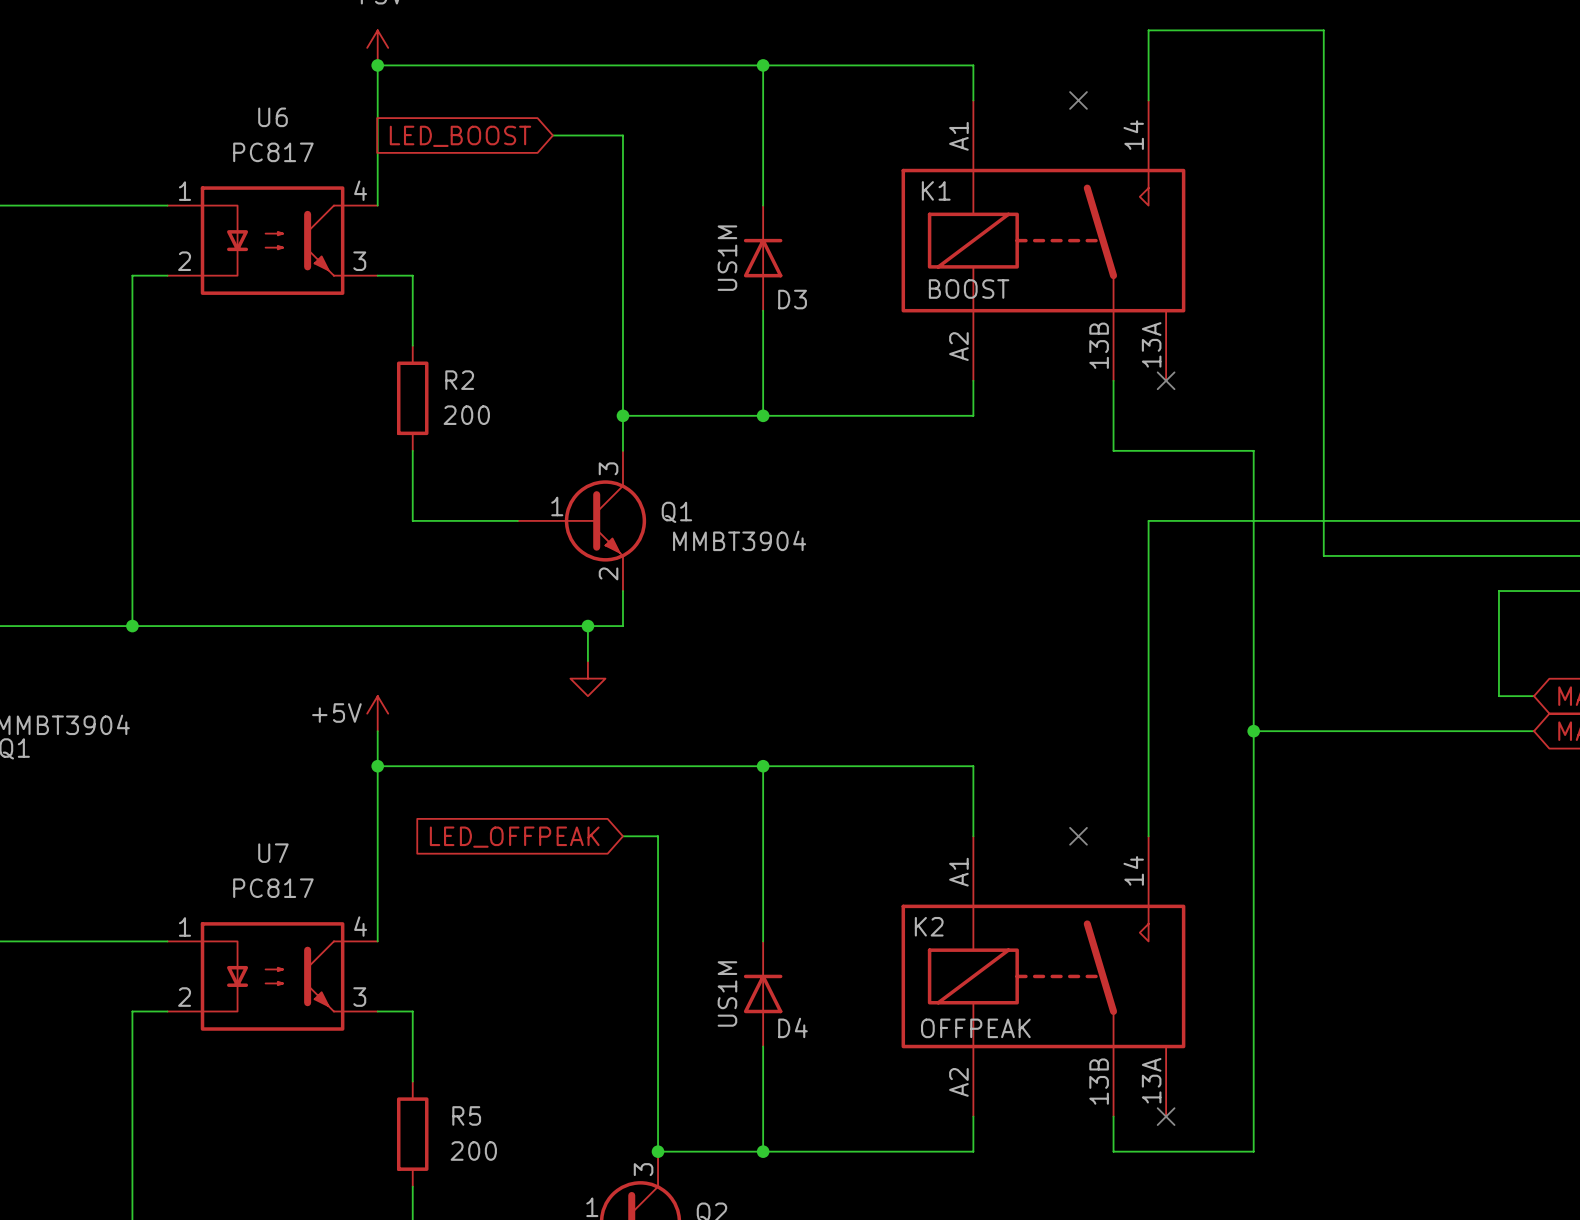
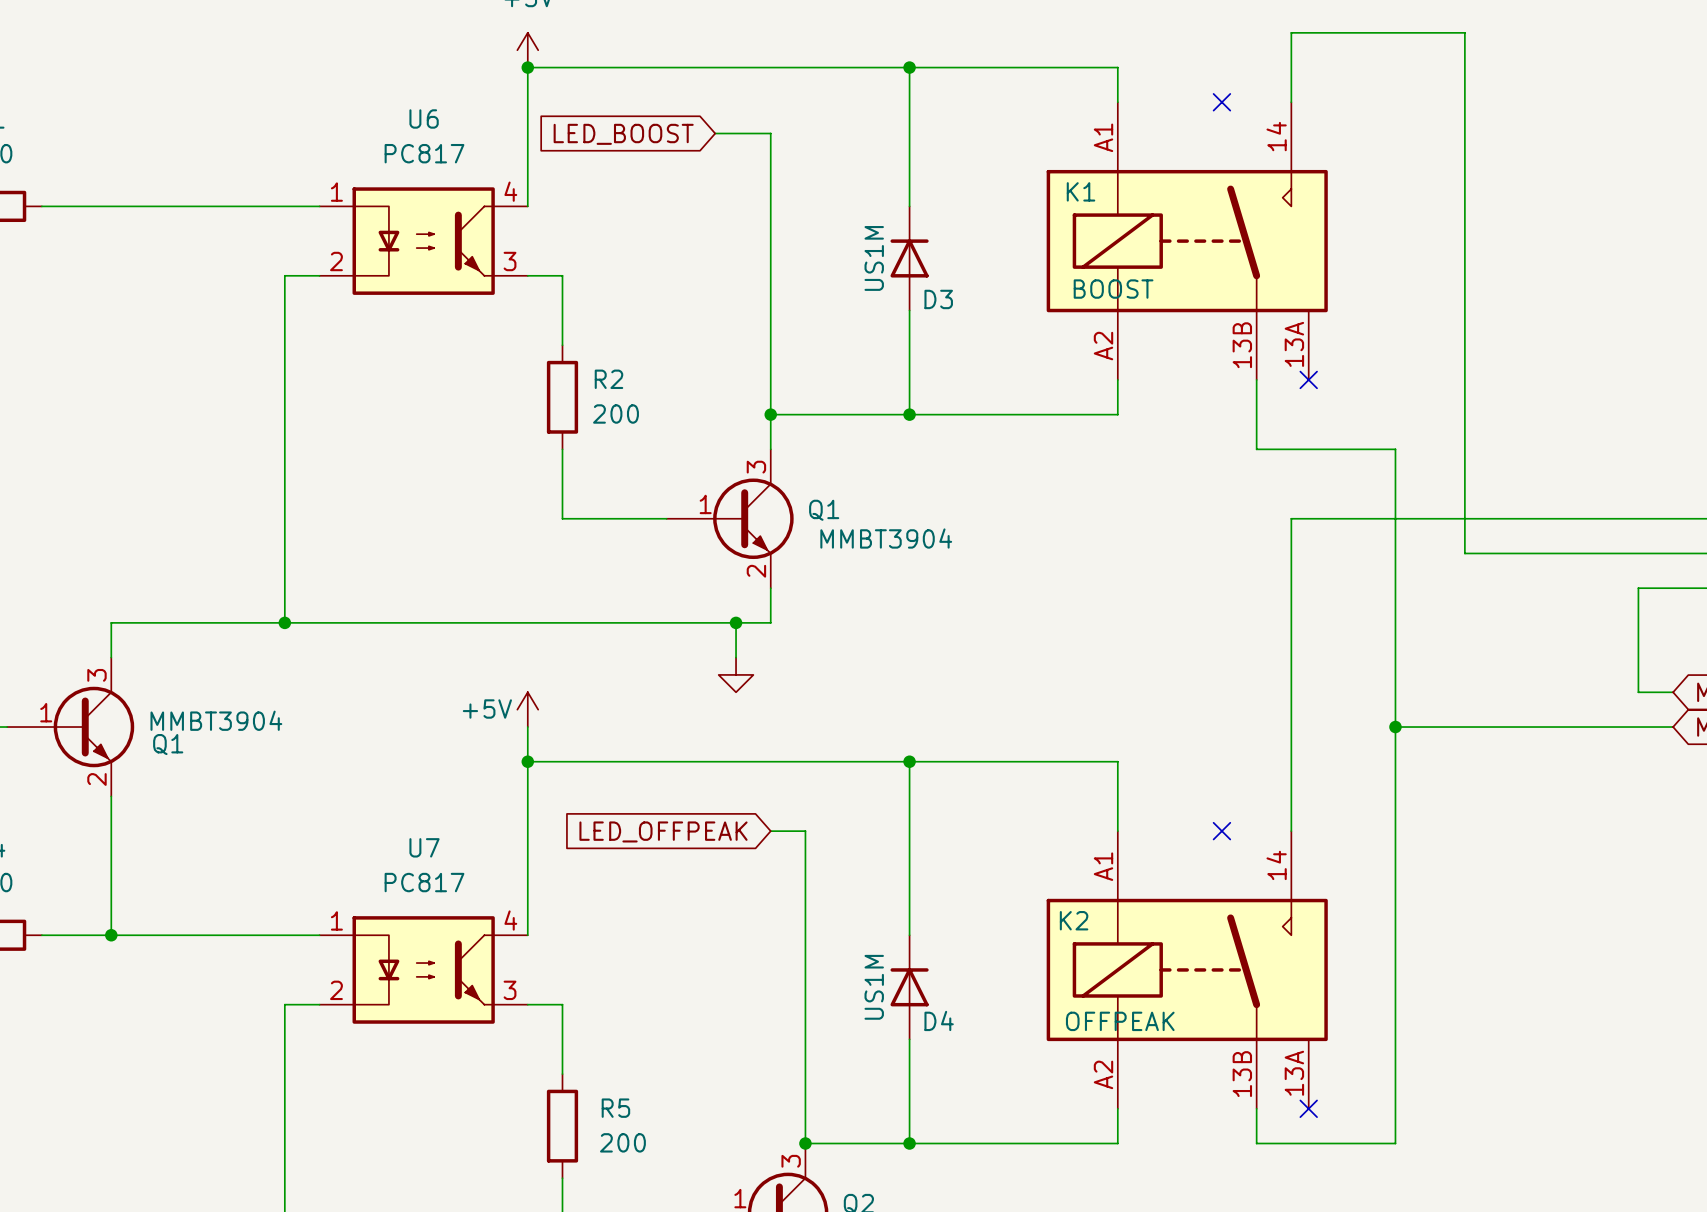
wire: (552, 135) (622, 135) -> (715, 133) (770, 133) (770, 136)
global label position: LED_BOOST (460, 136) -> LED_BOOST (623, 134)

